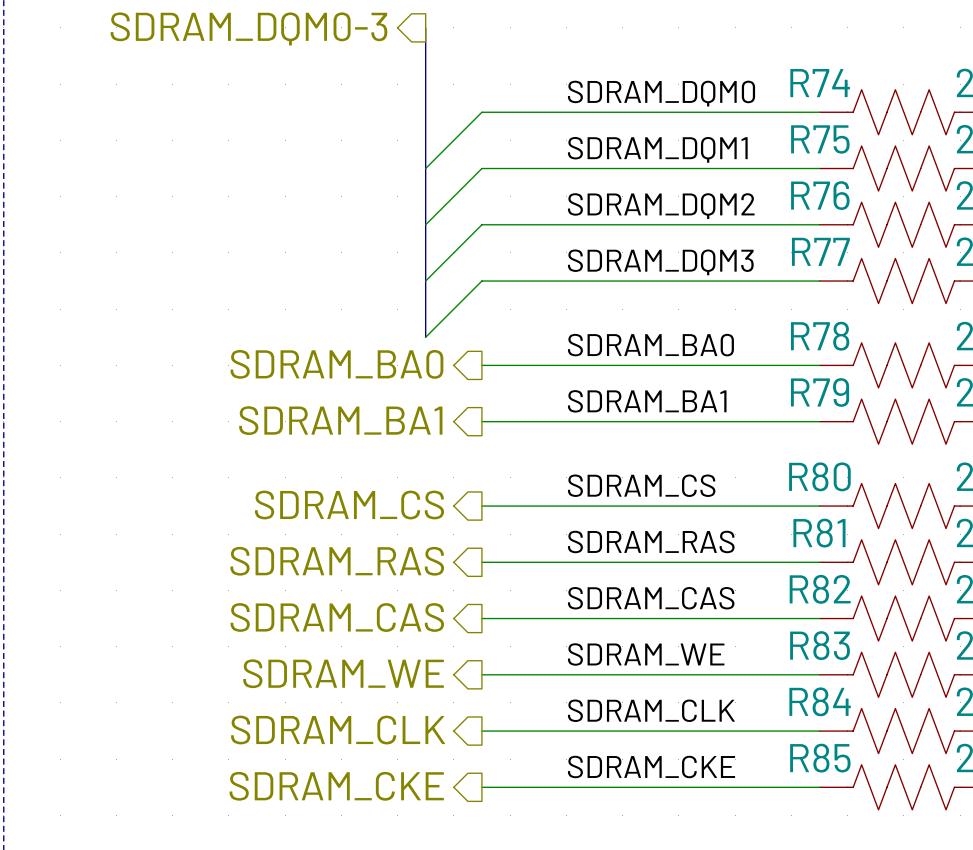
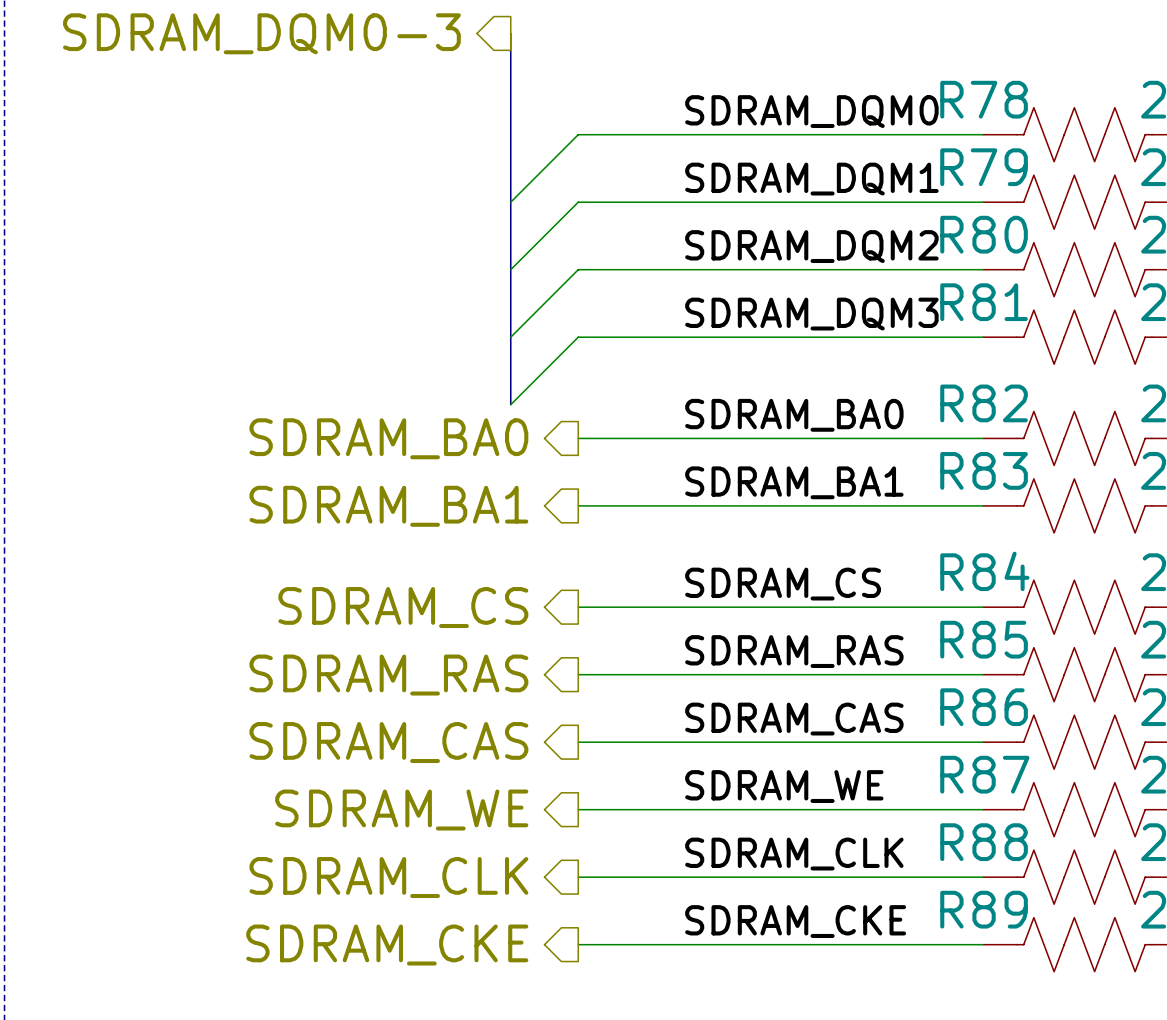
R74 name: R74 (820, 83) -> R78 (984, 99)
R75 name: R75 (820, 139) -> R79 (984, 167)
R76 name: R76 (820, 195) -> R80 (984, 234)
R77 name: R77 (820, 251) -> R81 (984, 302)
R78 name: R78 (820, 336) -> R82 (984, 403)
R79 name: R79 (820, 392) -> R83 (984, 470)
R80 name: R80 (819, 476) -> R84 (984, 571)
R81 name: R81 (819, 533) -> R85 (984, 639)
R82 name: R82 (820, 589) -> R86 (984, 707)
R83 name: R83 (820, 645) -> R87 (984, 774)
R84 name: R84 (820, 701) -> R88 (984, 842)
R85 name: R85 (820, 758) -> R89 (984, 909)

